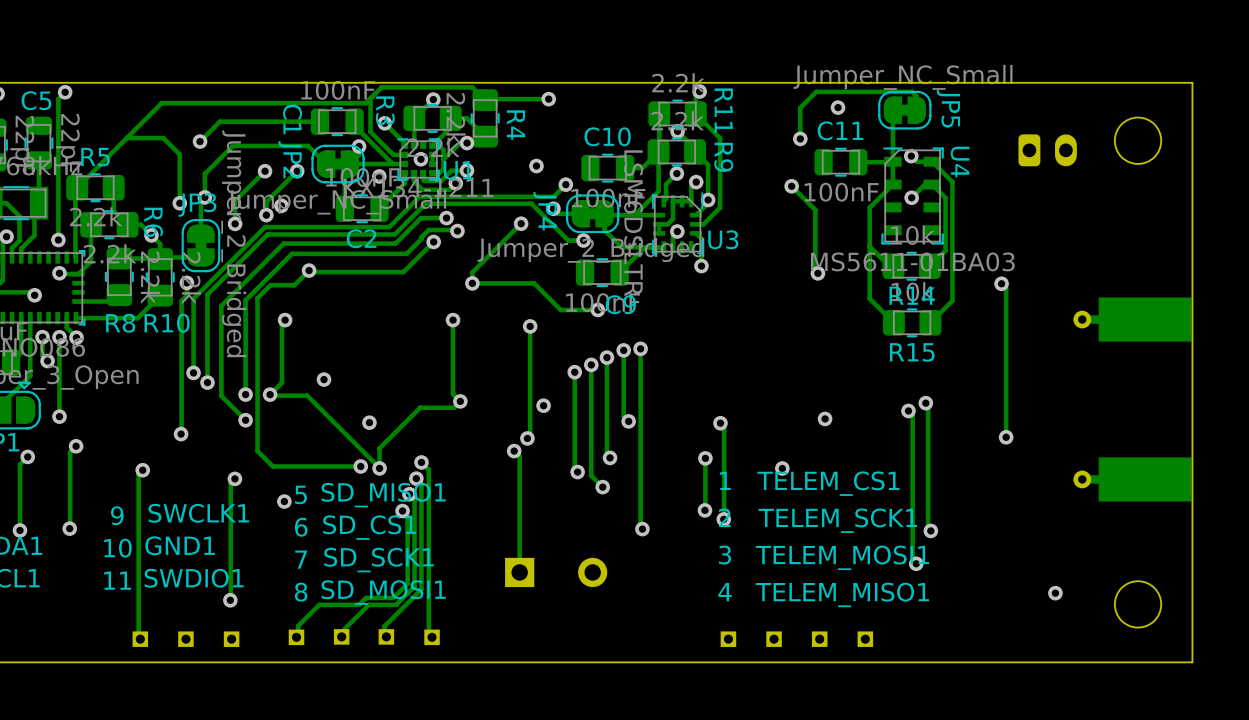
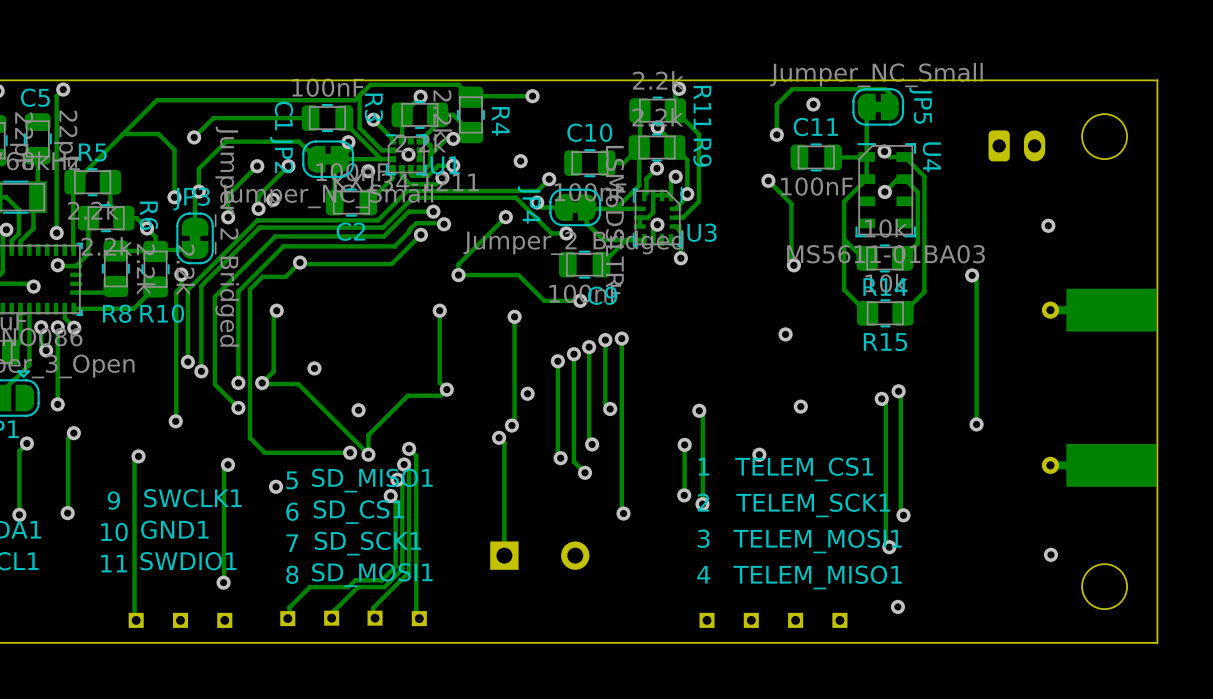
via: none -> (1048, 225)
via: none -> (785, 334)
via position: (1055, 593) -> (1050, 554)
via: none -> (897, 606)

